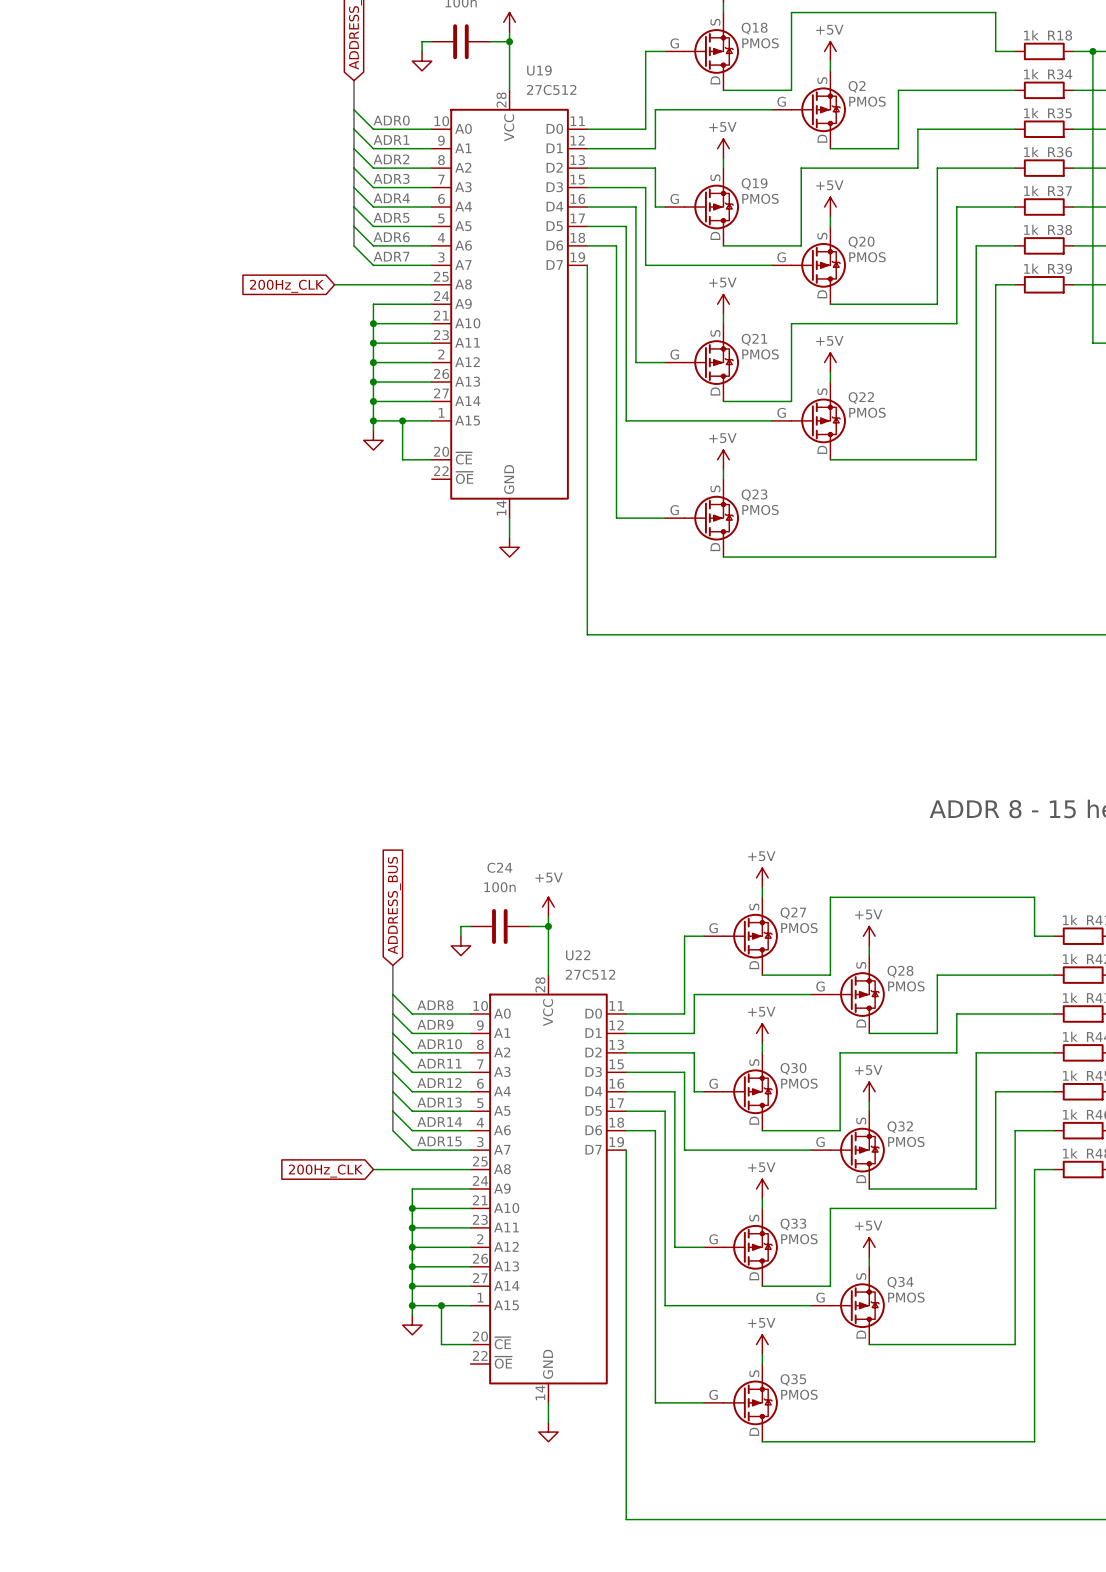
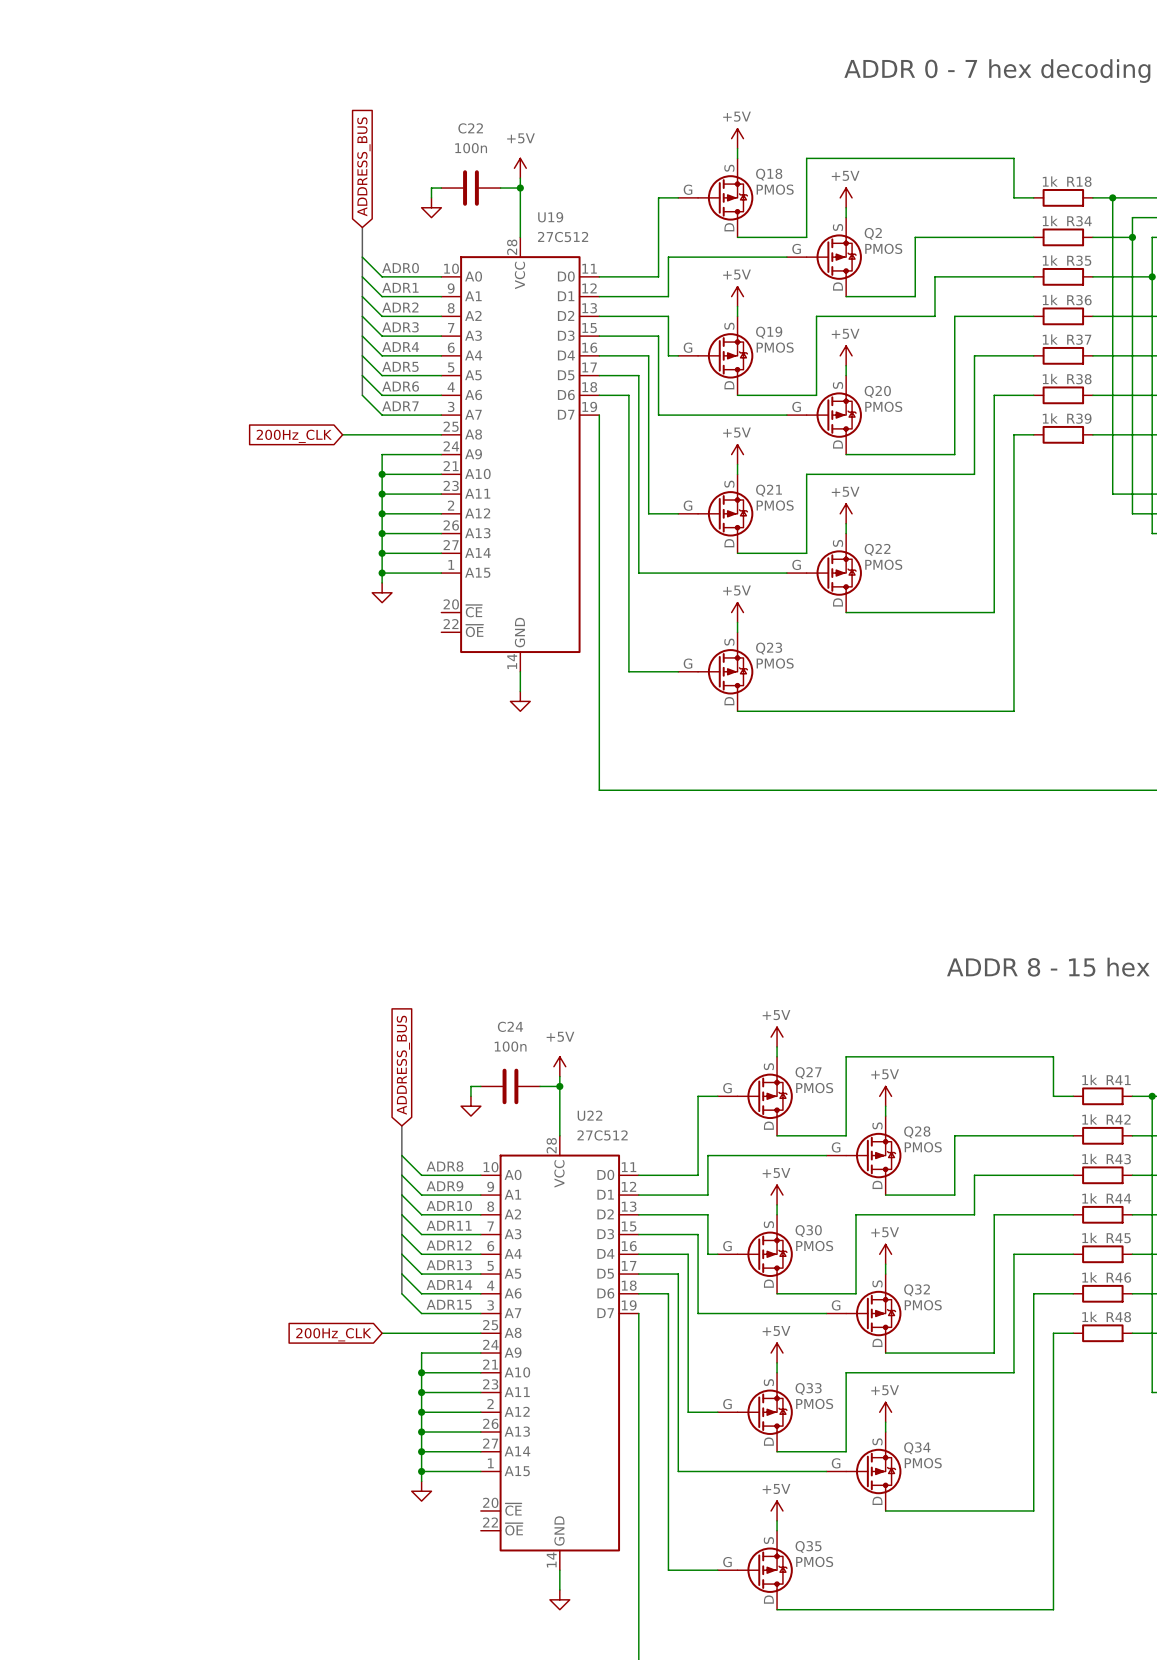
wire: (402, 420) (402, 459) (431, 459) -> none
junction: (402, 420) -> none
wire: (441, 1305) (441, 1344) (470, 1344) -> none
junction: (441, 1305) -> none

